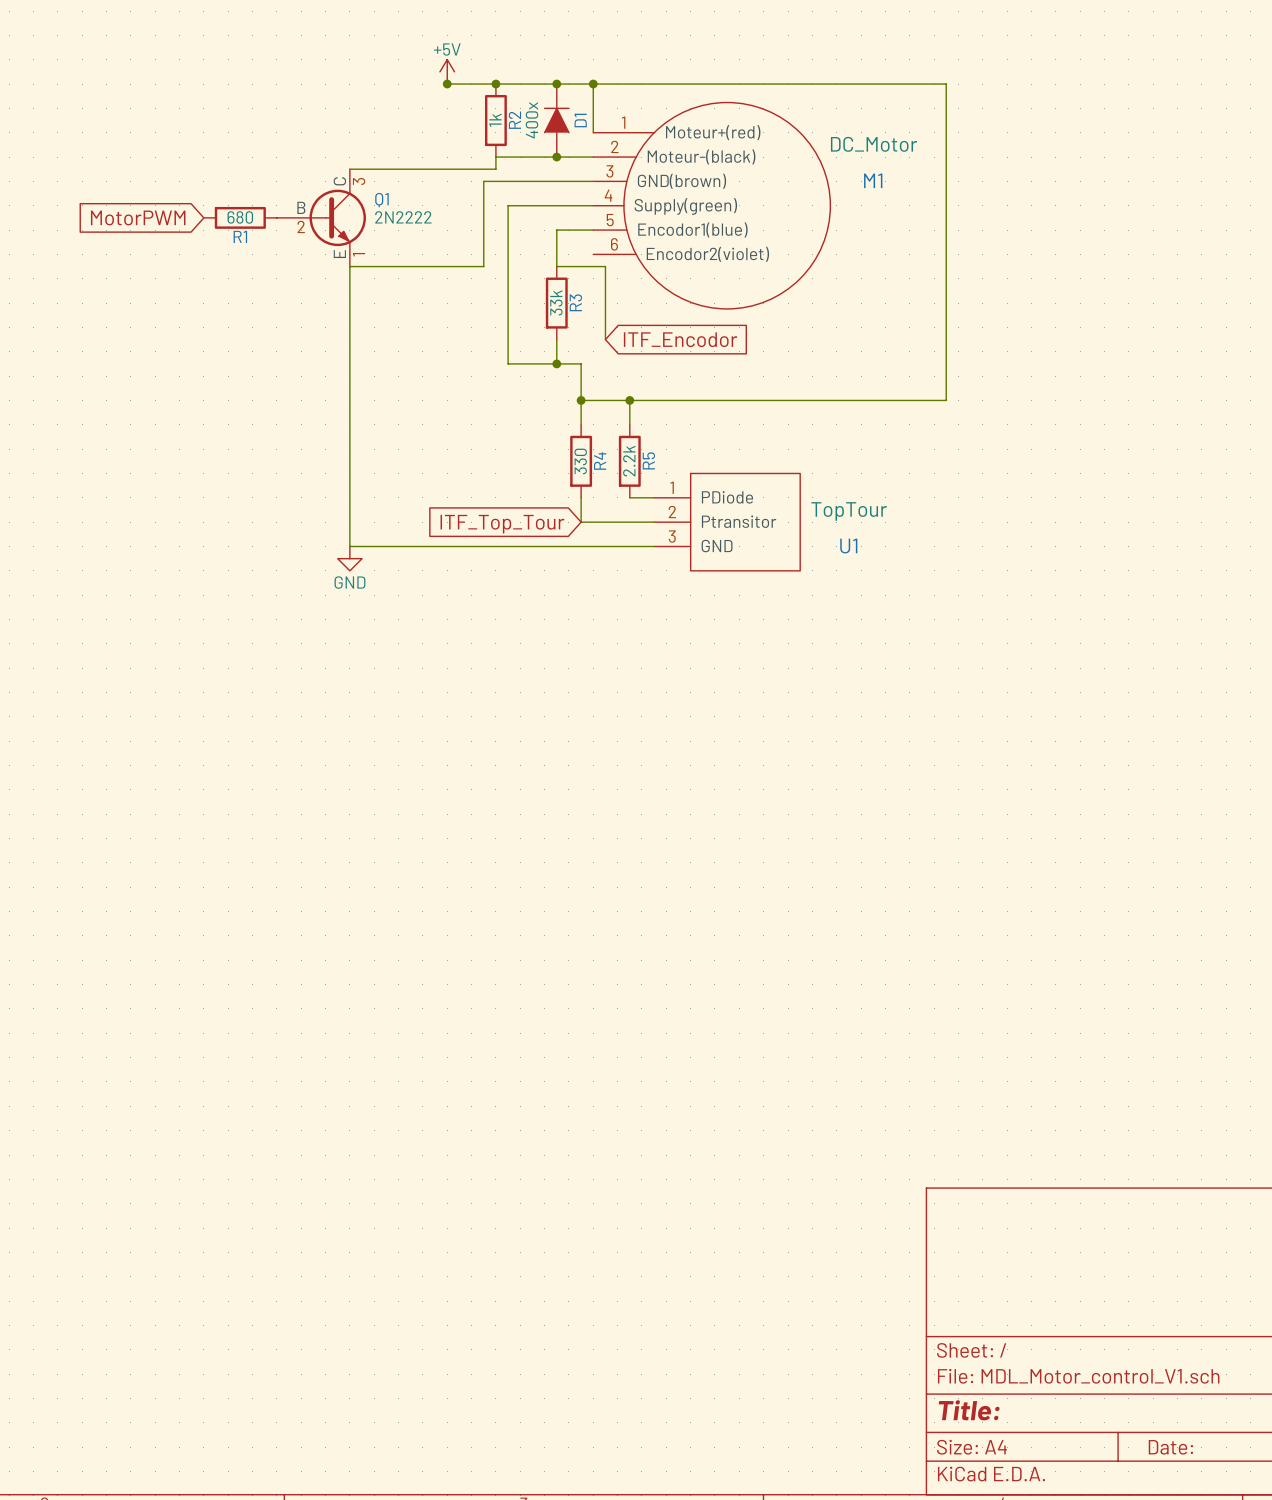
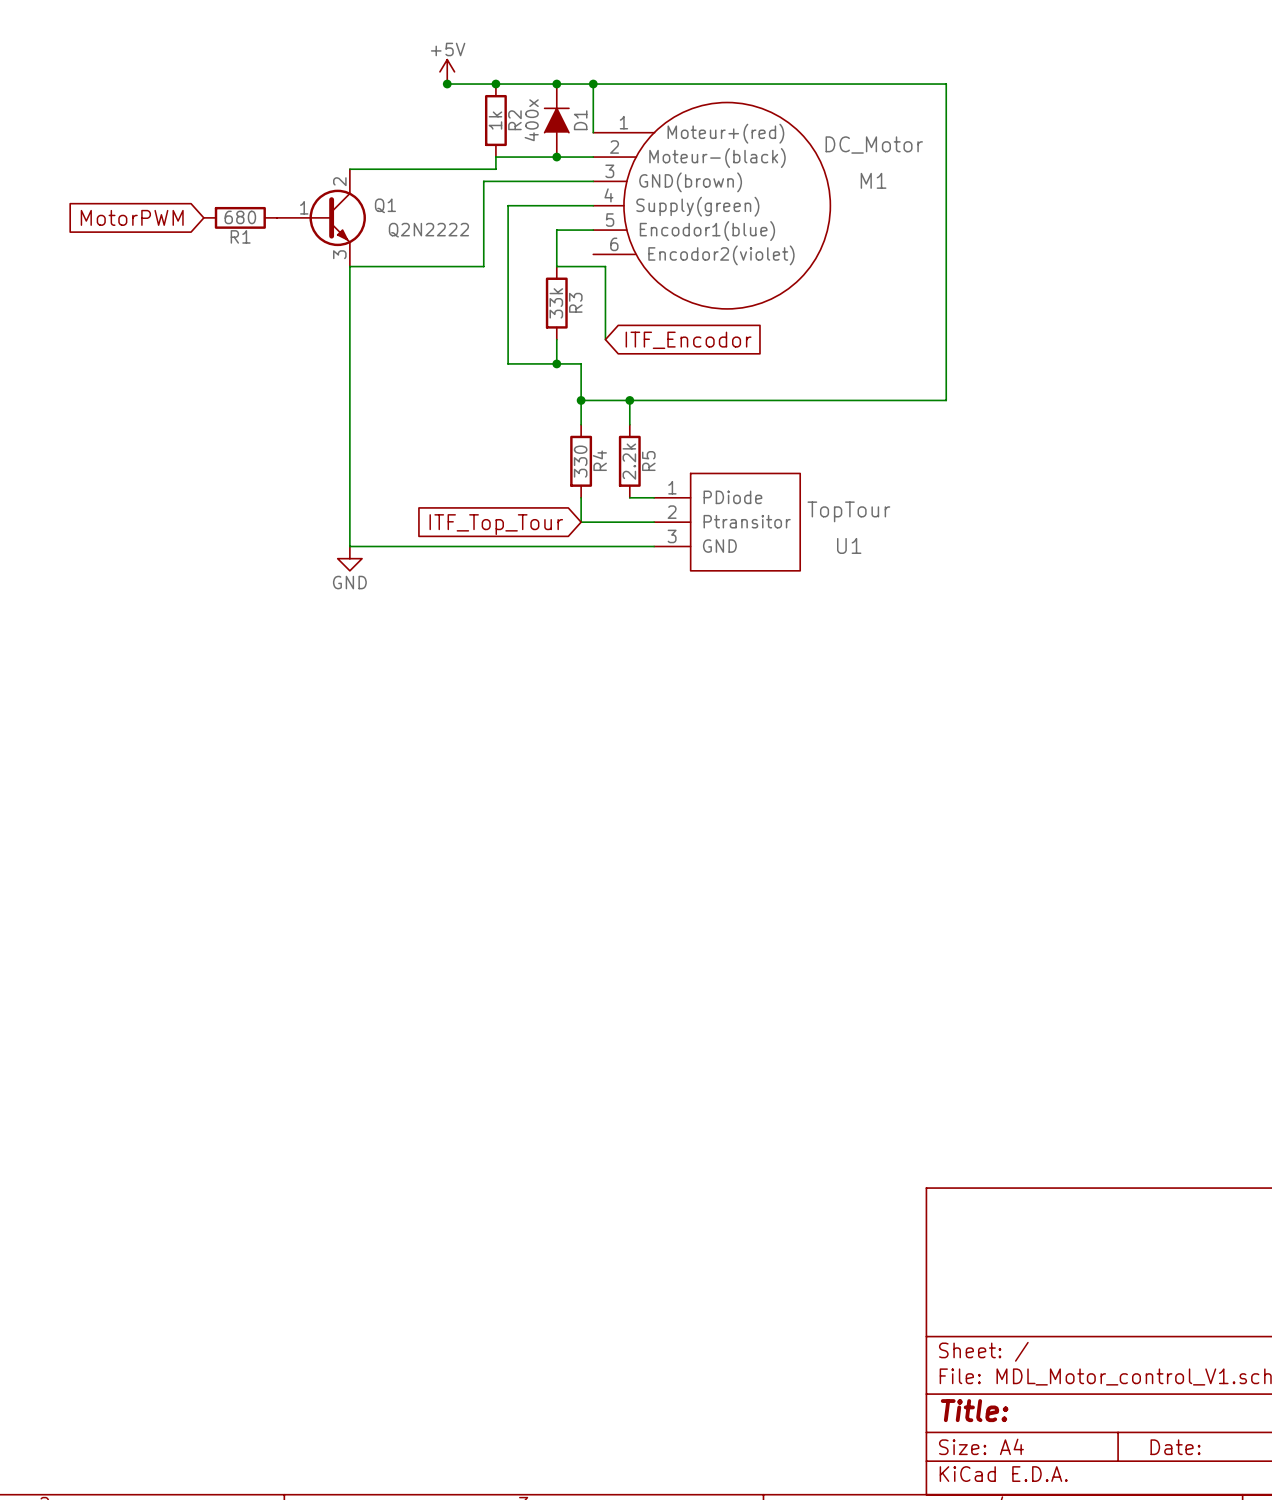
Q1 symbol: [276, 169, 366, 267] -> [276, 169, 366, 267]
Q1 value: 2N2222 (403, 217) -> Q2N2222 (428, 230)

